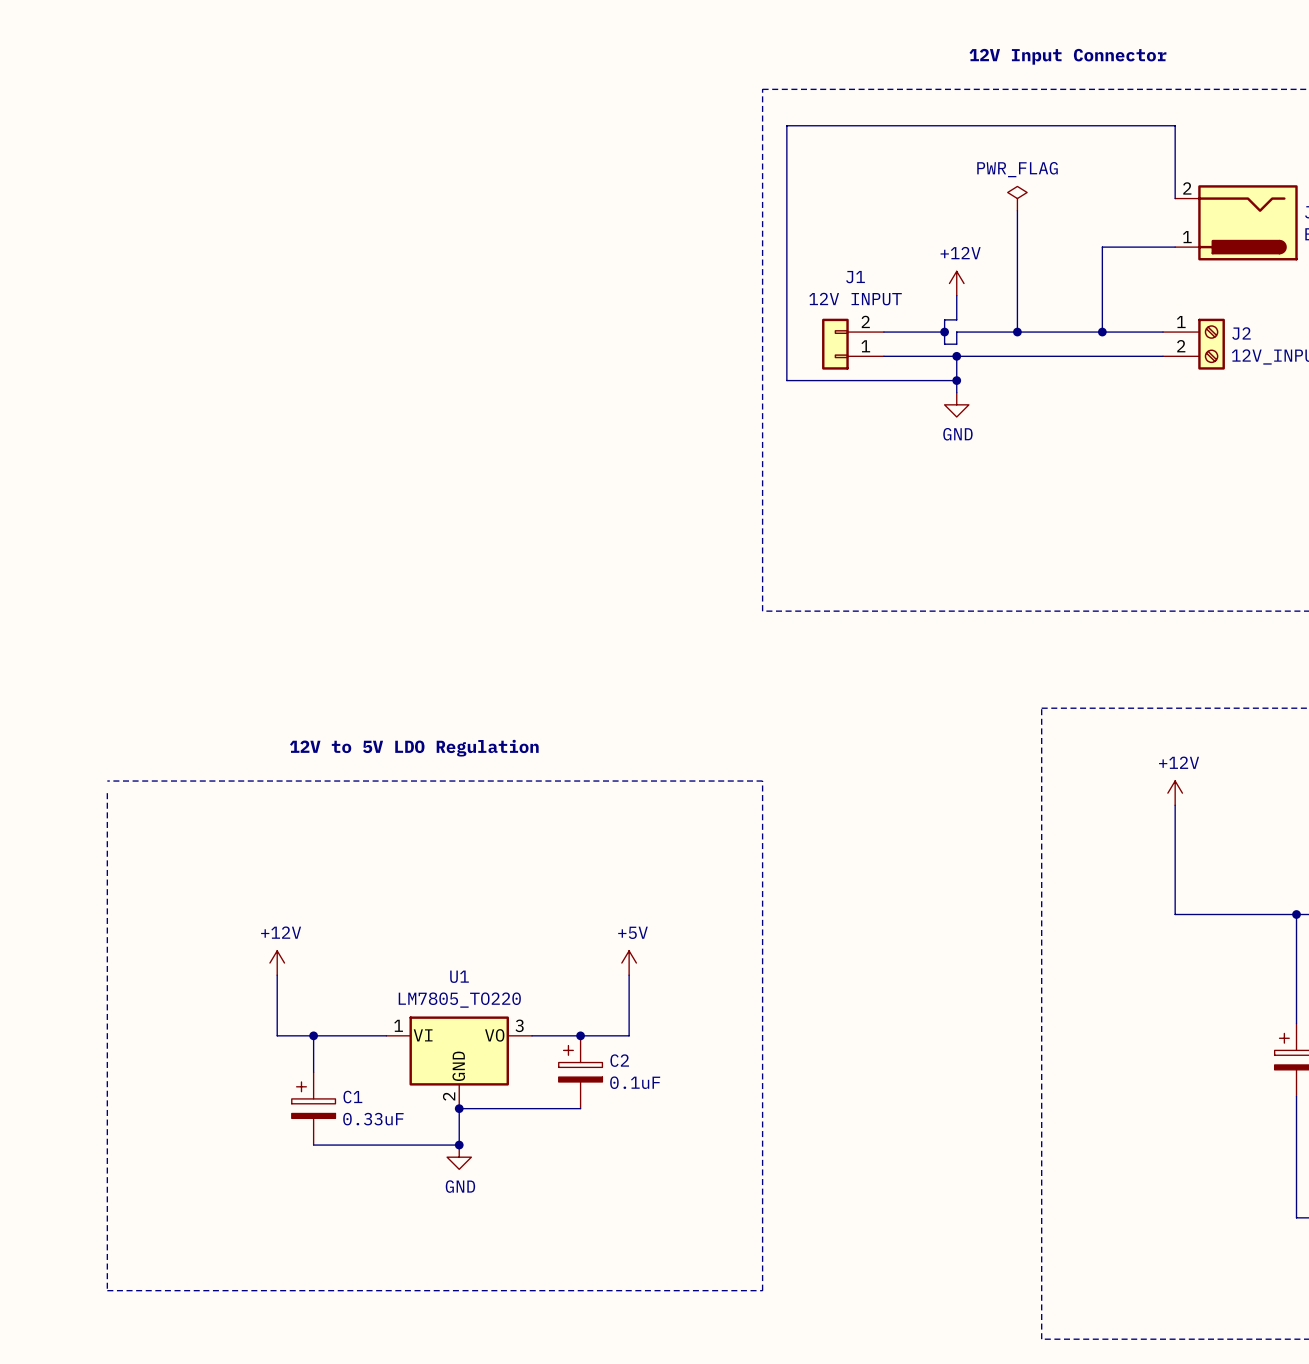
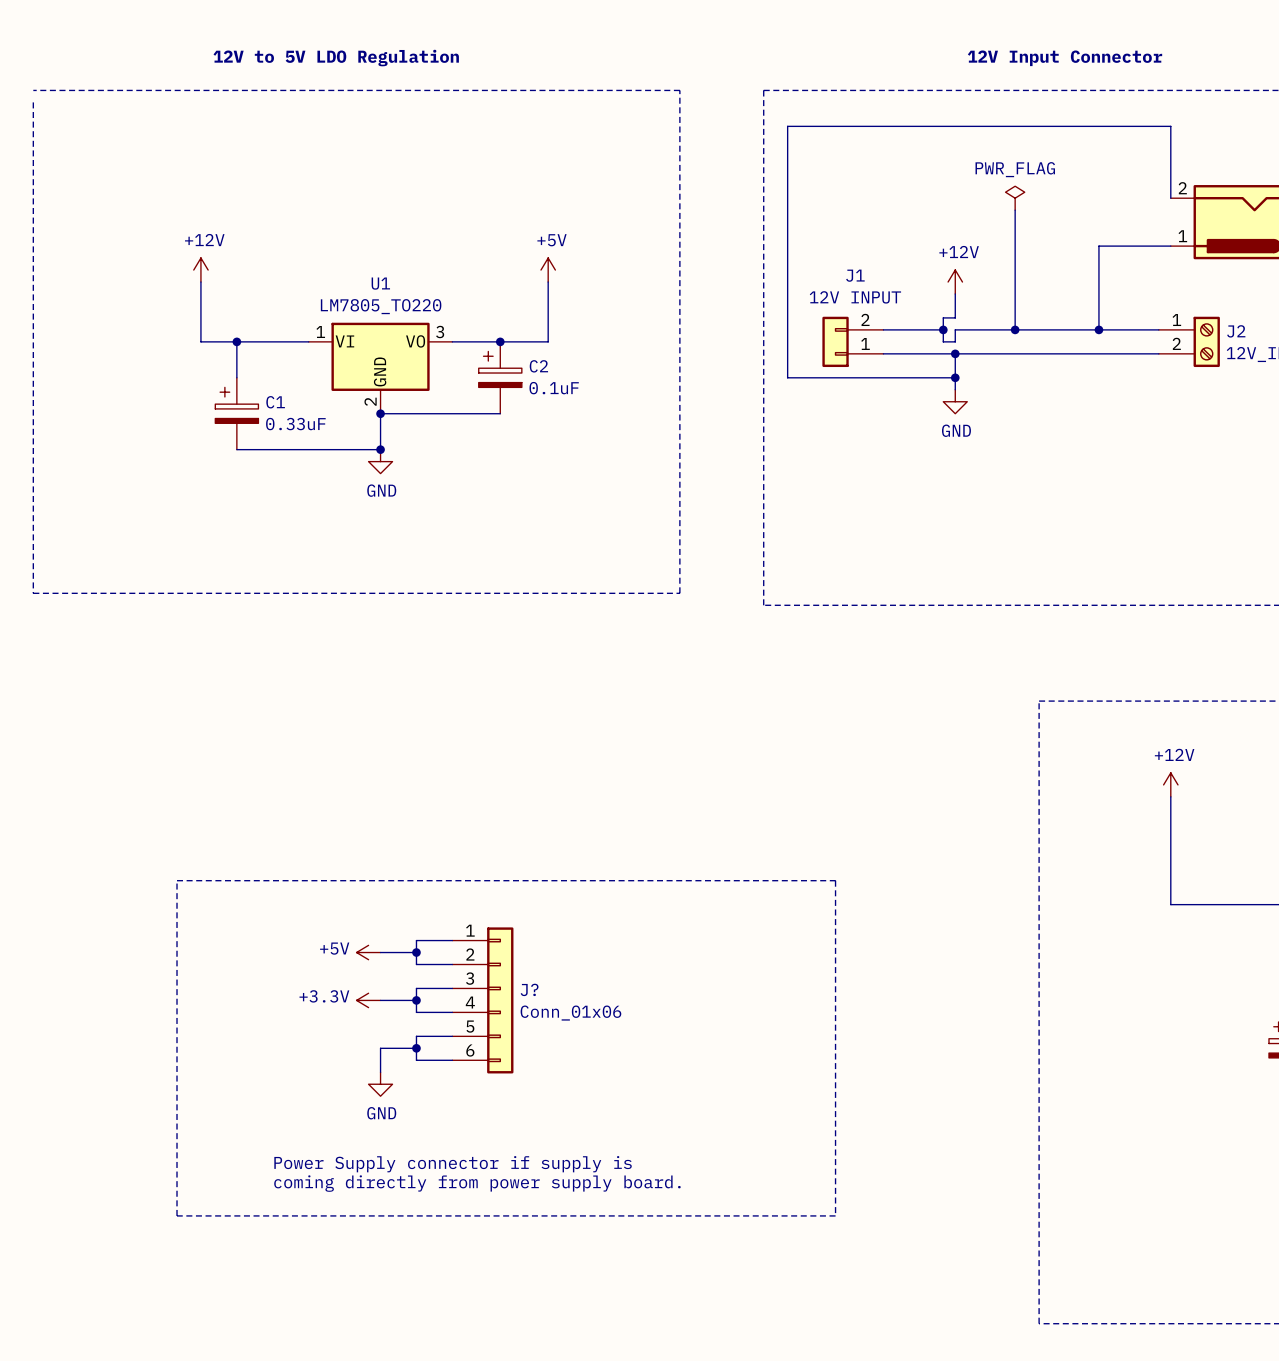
text: none -> 12V to 5V LDO Regulation (336, 58)
line: none -> (33, 90) (679, 90) (679, 593) (33, 593) (33, 102)
power symbol: none -> +12V (200, 270)
power symbol: none -> +5V (548, 270)
wire: none -> (200, 282) (200, 341) (308, 341)
wire: none -> (548, 282) (548, 341) (452, 341)
wire: none -> (236, 341) (236, 377)
junction: none -> (236, 341)
junction: none -> (500, 341)
junction: none -> (380, 413)
wire: none -> (500, 413) (380, 413) (380, 449) (236, 449)
junction: none -> (380, 449)
power symbol: none -> GND (380, 461)
text: 12V to 5V LDO Regulation (414, 748) -> none
line: (107, 781) (762, 781) (762, 1290) (107, 1290) (107, 793) -> none
line: none -> (177, 880) (177, 1215) (835, 1215) (835, 880) (177, 880)
wire: none -> (452, 940) (416, 940) (416, 964) (452, 964)
power symbol: +12V (277, 963) -> none
power symbol: none -> +5V (368, 952)
wire: none -> (380, 952) (416, 952)
junction: none -> (416, 952)
power symbol: +5V (629, 963) -> none
wire: (277, 975) (277, 1035) (386, 1035) -> none
wire: (629, 975) (629, 1035) (532, 1035) -> none
power symbol: none -> +3.3V (368, 1000)
wire: none -> (380, 1000) (416, 1000)
junction: none -> (416, 1000)
J?: none -> Conn_01x06 (482, 1000)
wire: (313, 1035) (313, 1072) -> none
junction: (313, 1035) -> none
junction: (580, 1035) -> none
wire: none -> (416, 1048) (380, 1048) (380, 1072)
junction: none -> (416, 1048)
U1 position: (459, 1062) -> (380, 368)
C2 position: (580, 1072) -> (500, 377)
C1 position: (313, 1108) -> (236, 413)
junction: (459, 1108) -> none
wire: (580, 1108) (459, 1108) (459, 1145) (313, 1145) -> none
junction: (459, 1145) -> none
power symbol position: GND (459, 1157) -> GND (380, 1084)
text: none -> Power Supply connector if supply is (453, 1164)
text: none -> coming directly from power supply board. (477, 1183)

